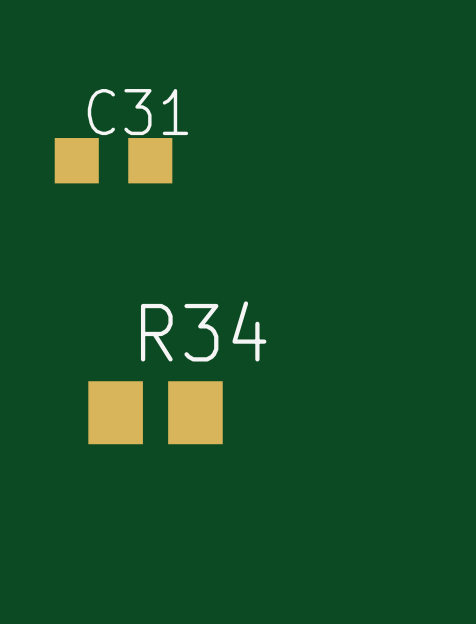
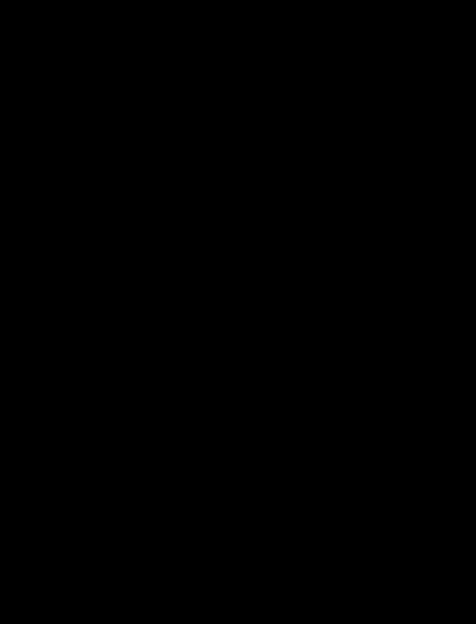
C31: (113, 160) -> none
R34: (155, 412) -> none

